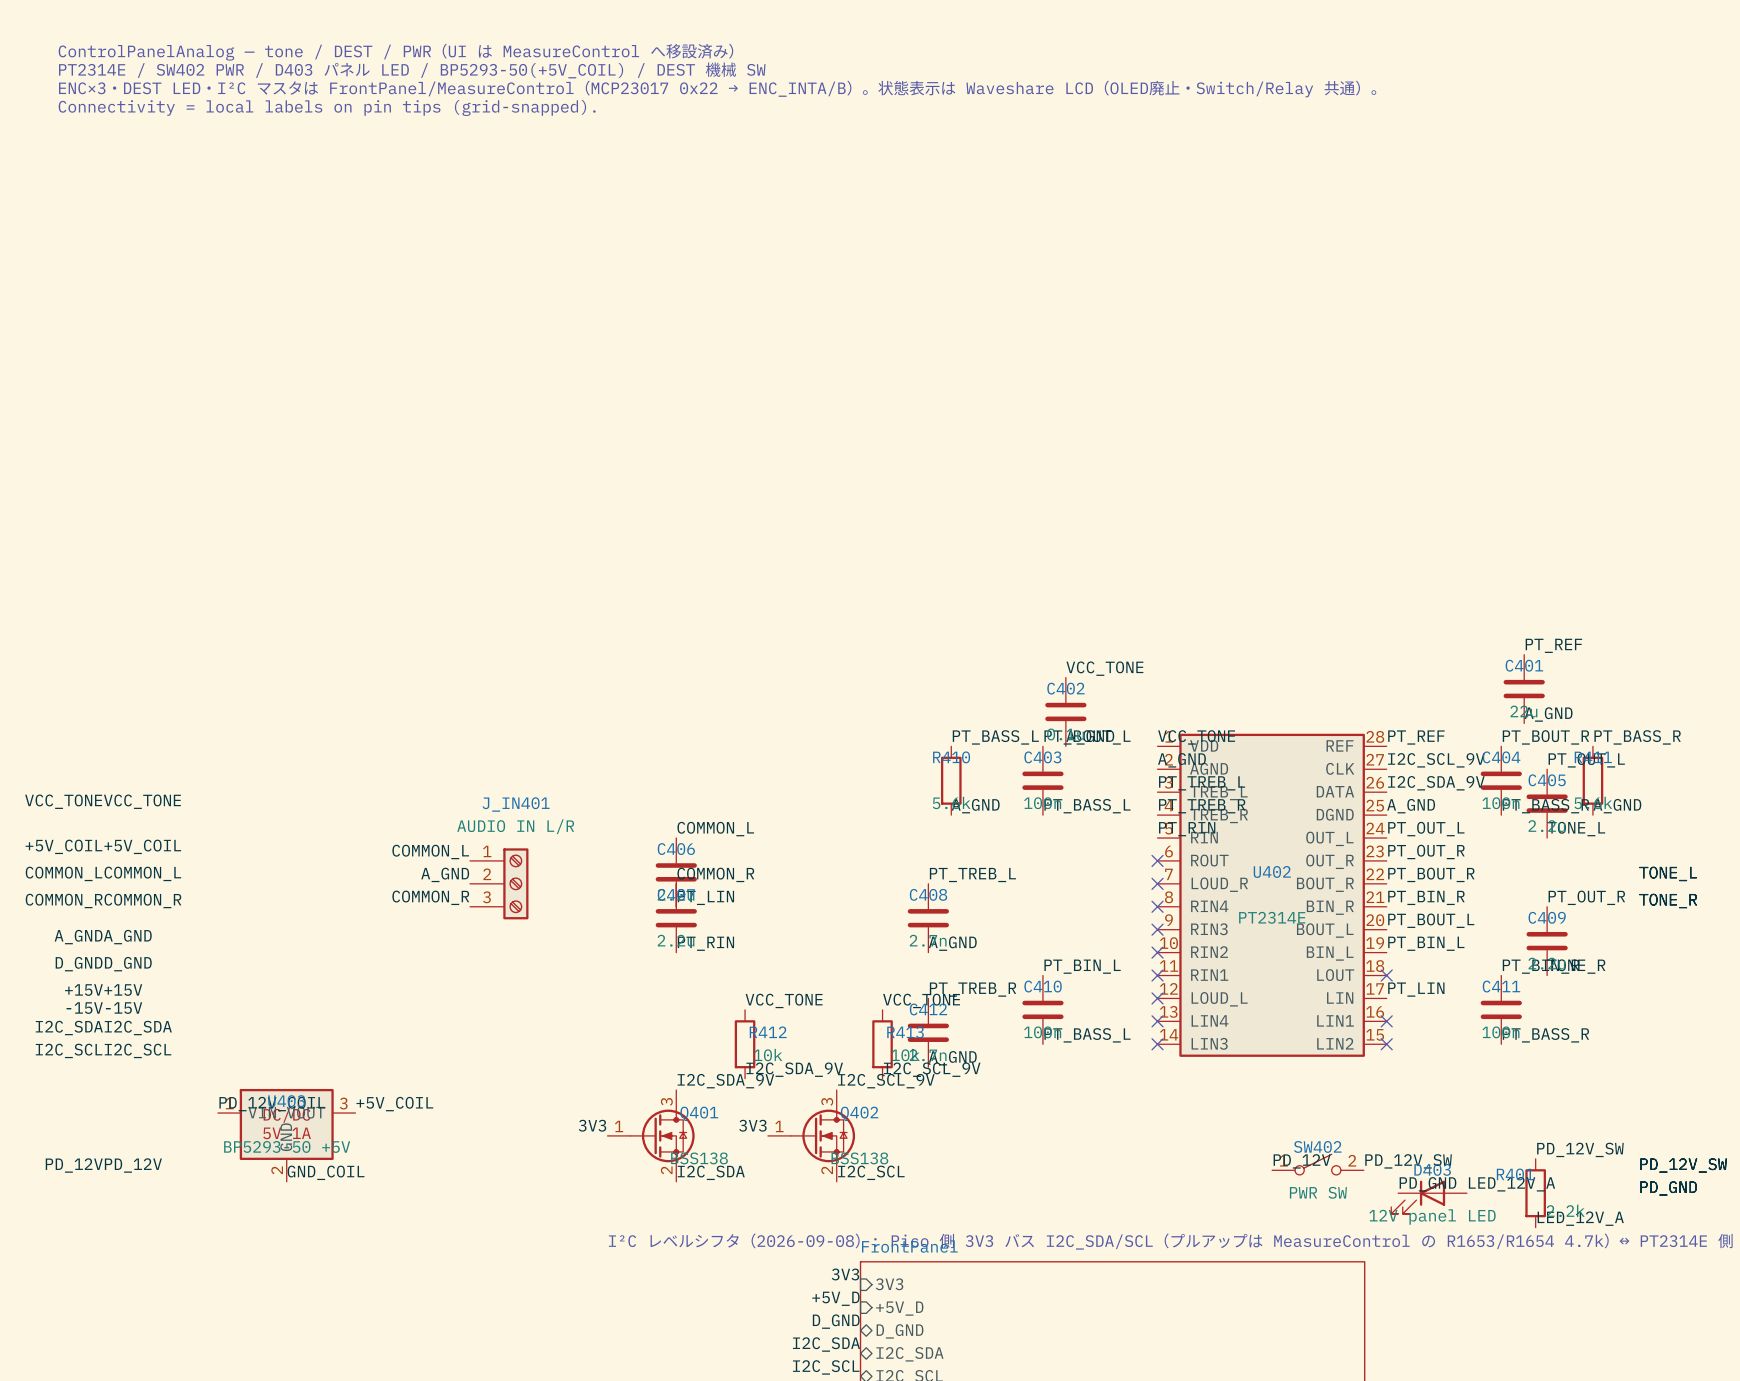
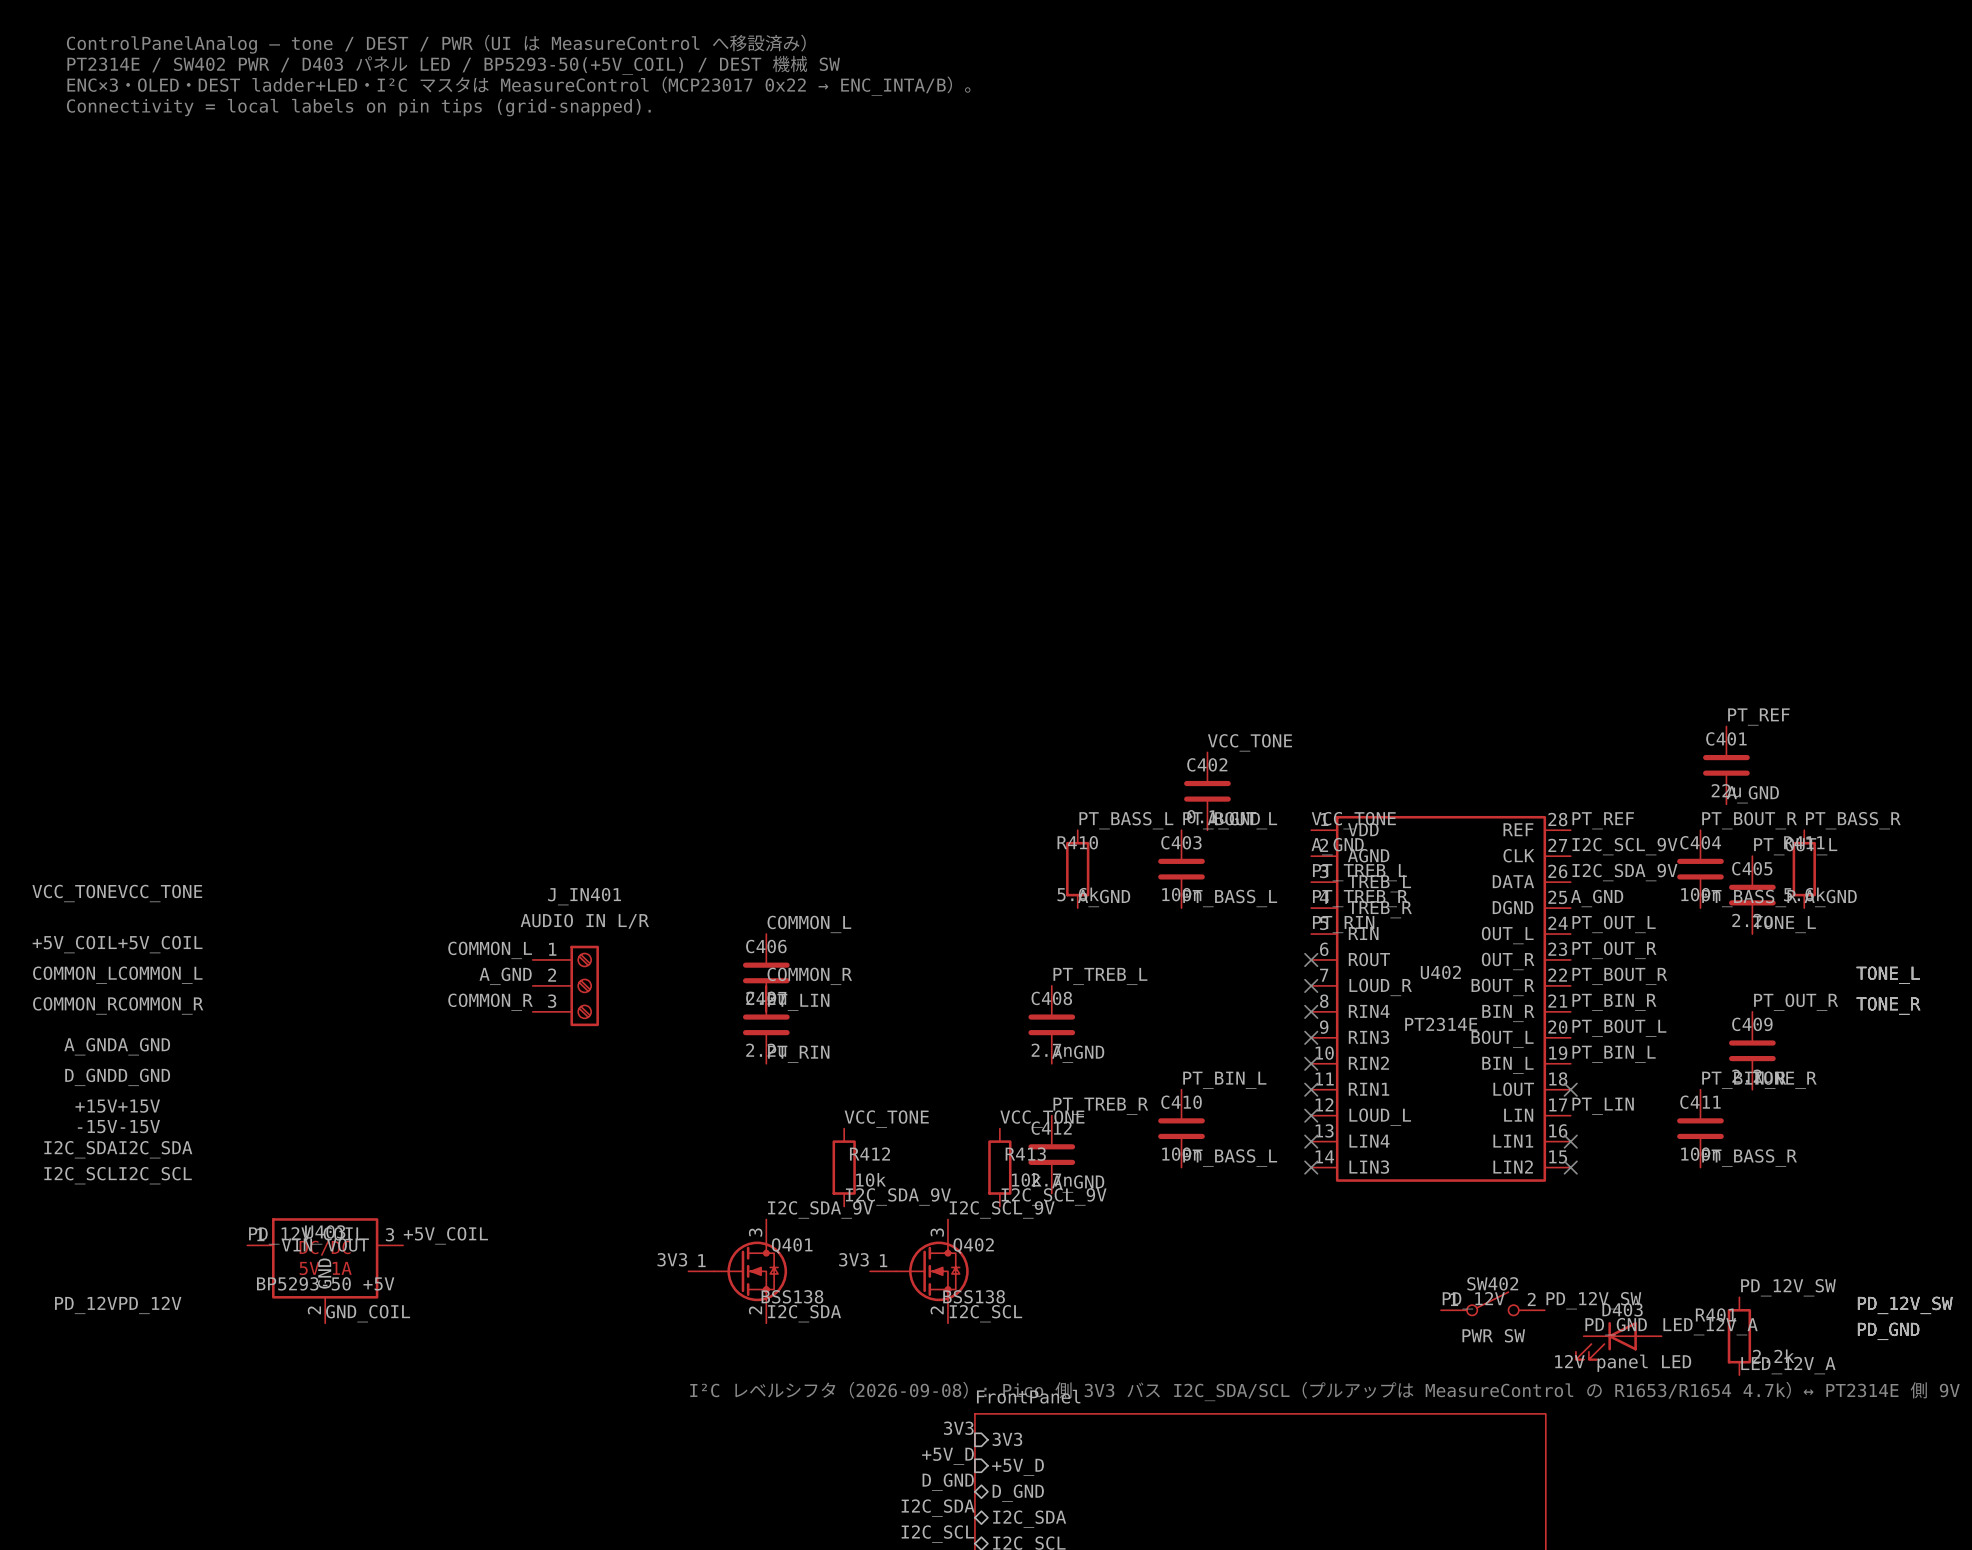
text: ENC×3・DEST LED・I²C マスタは FrontPanel/MeasureControl（MCP23017 0x22 → ENC_INTA/B）。状態表示は Waveshare LCD（OLED廃止・Switch/Relay 共通）。 (717, 88) -> ENC×3・OLED・DEST ladder+LED・I²C マスタは MeasureControl（MCP23017 0x22 → ENC_INTA/B）。 (518, 86)

